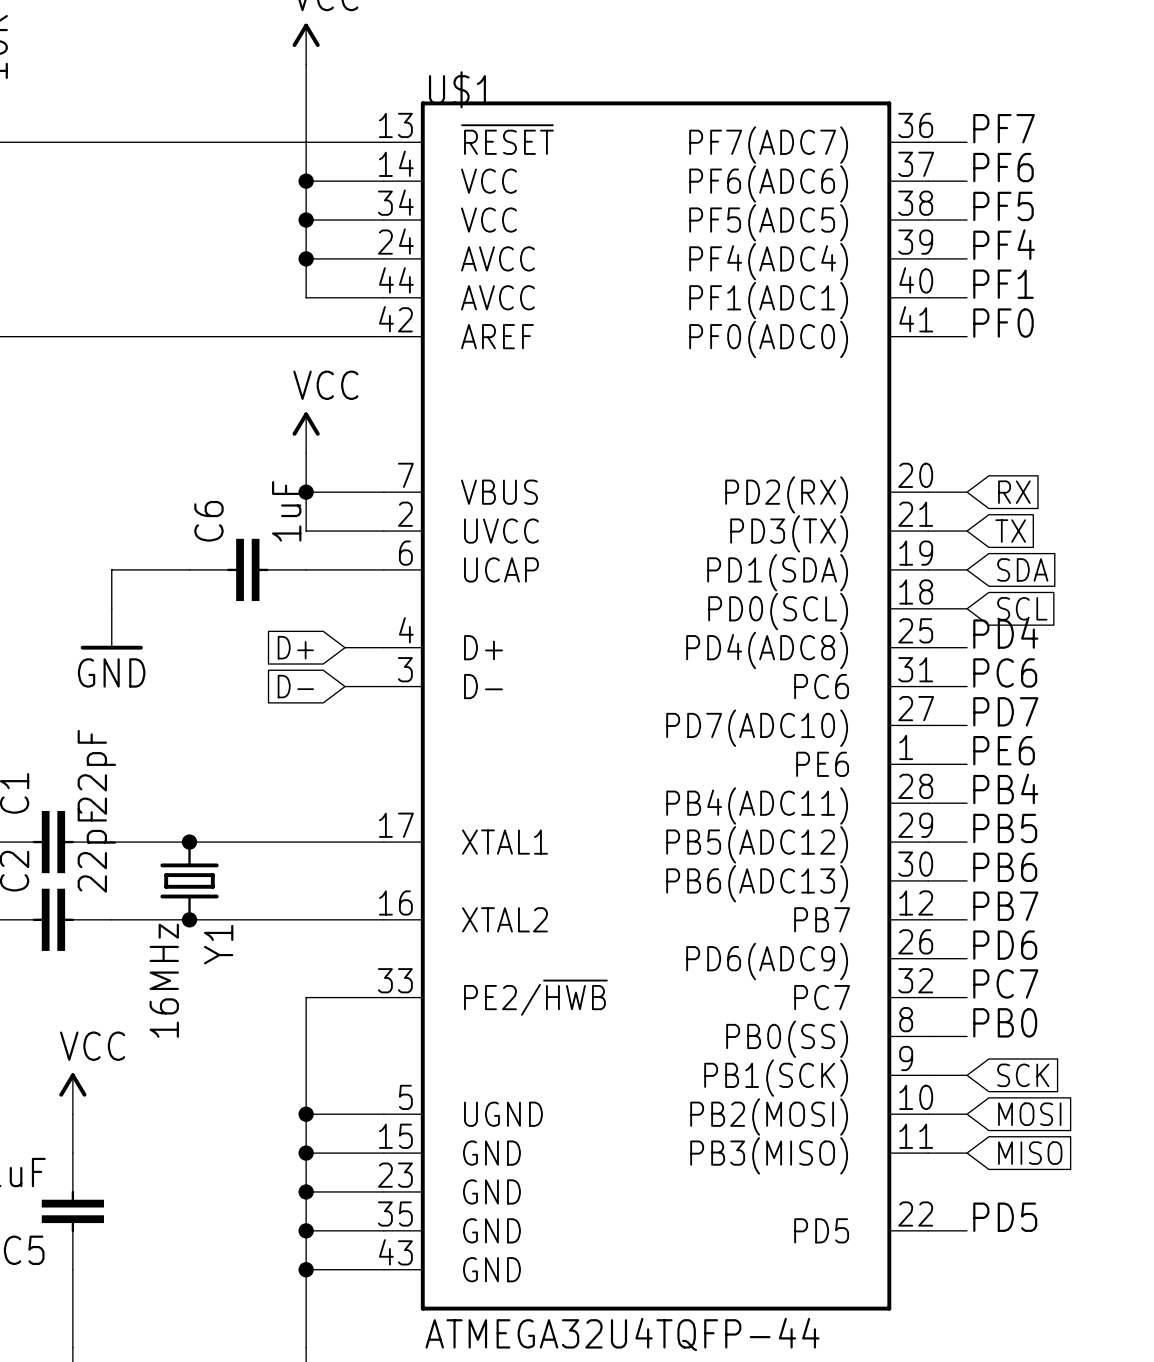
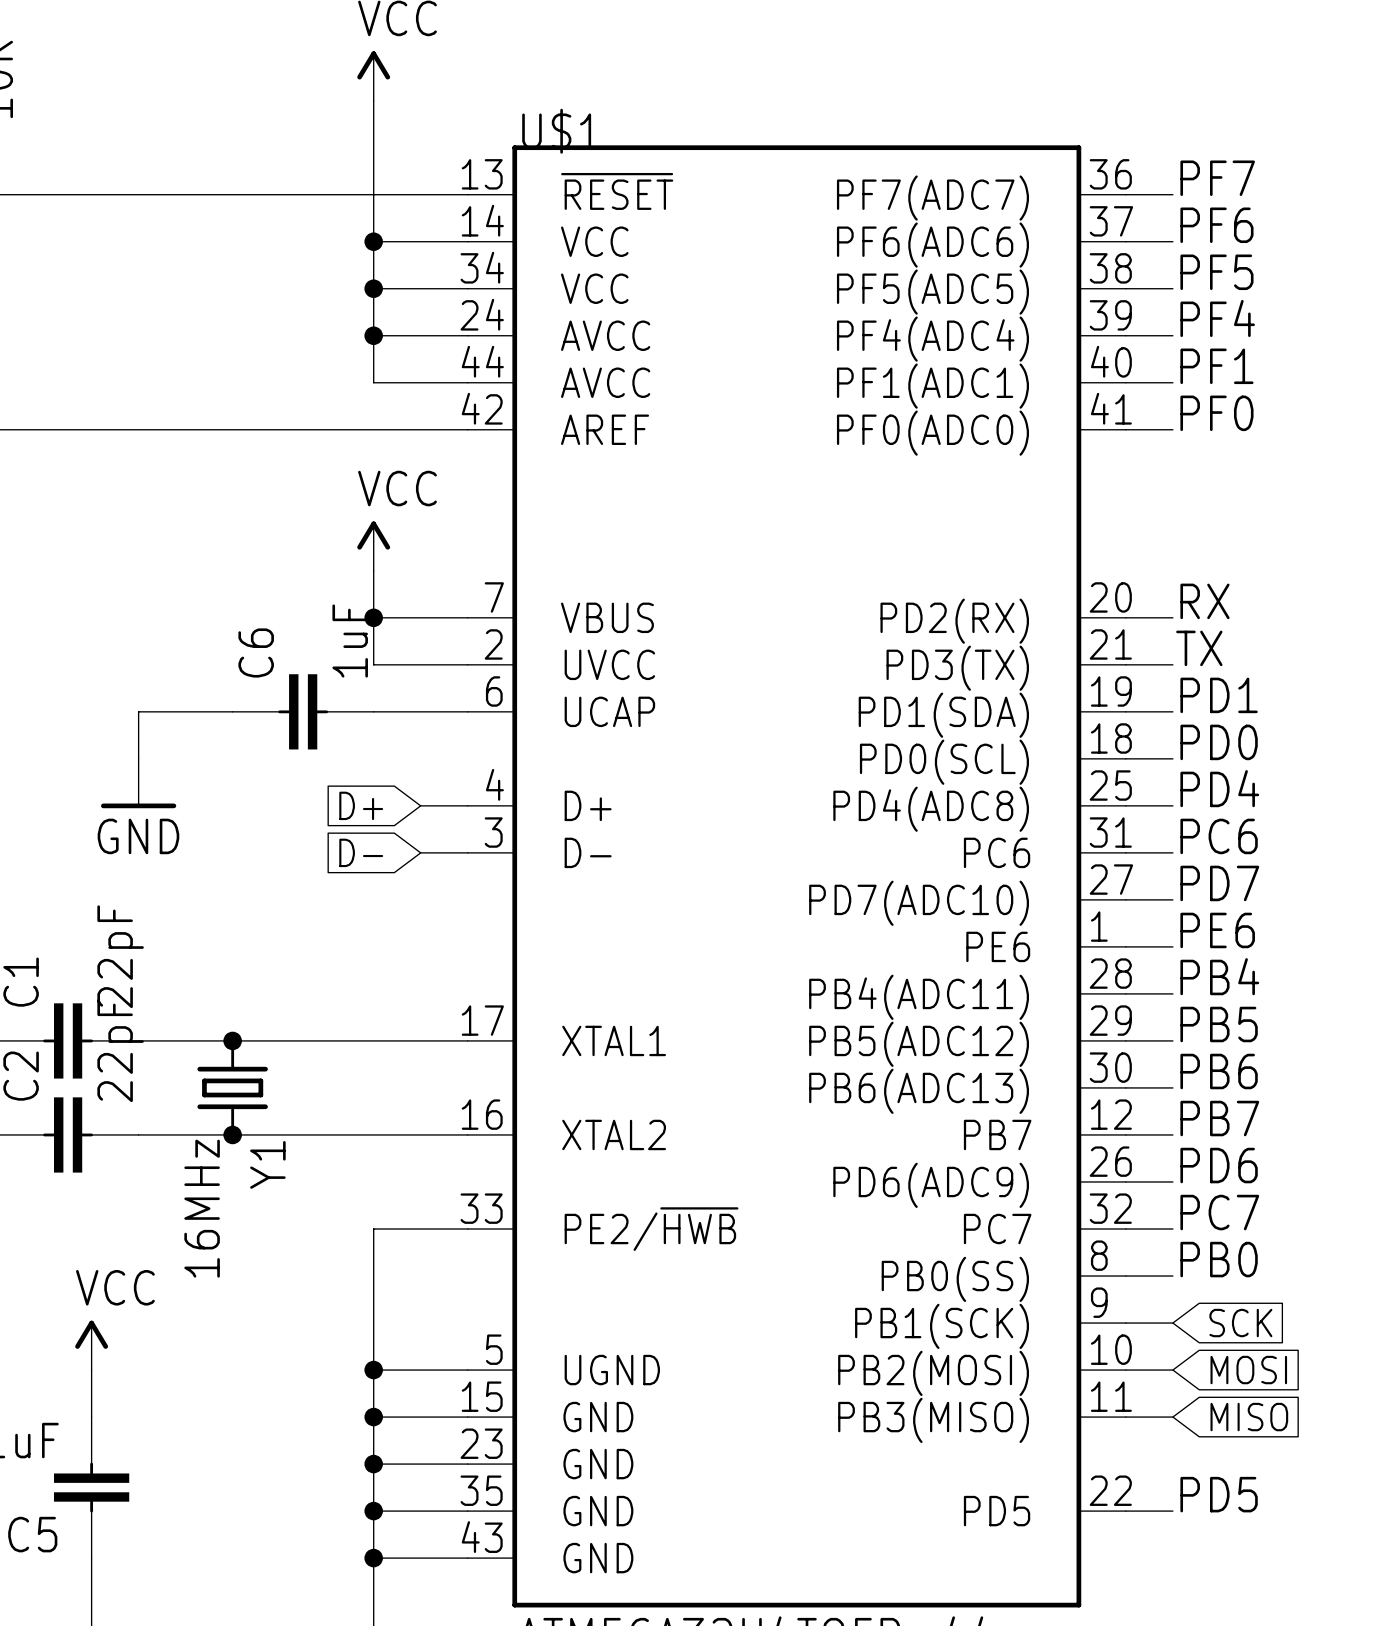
label: none -> RX (1204, 601)
global label: RX (1014, 492) -> none
label: none -> TX (1199, 648)
global label: TX (1010, 531) -> none
label: none -> PD1 (1219, 695)
global label: SDA (1022, 569) -> none
label: none -> PD0 (1219, 742)
global label: SCL (1022, 608) -> none

